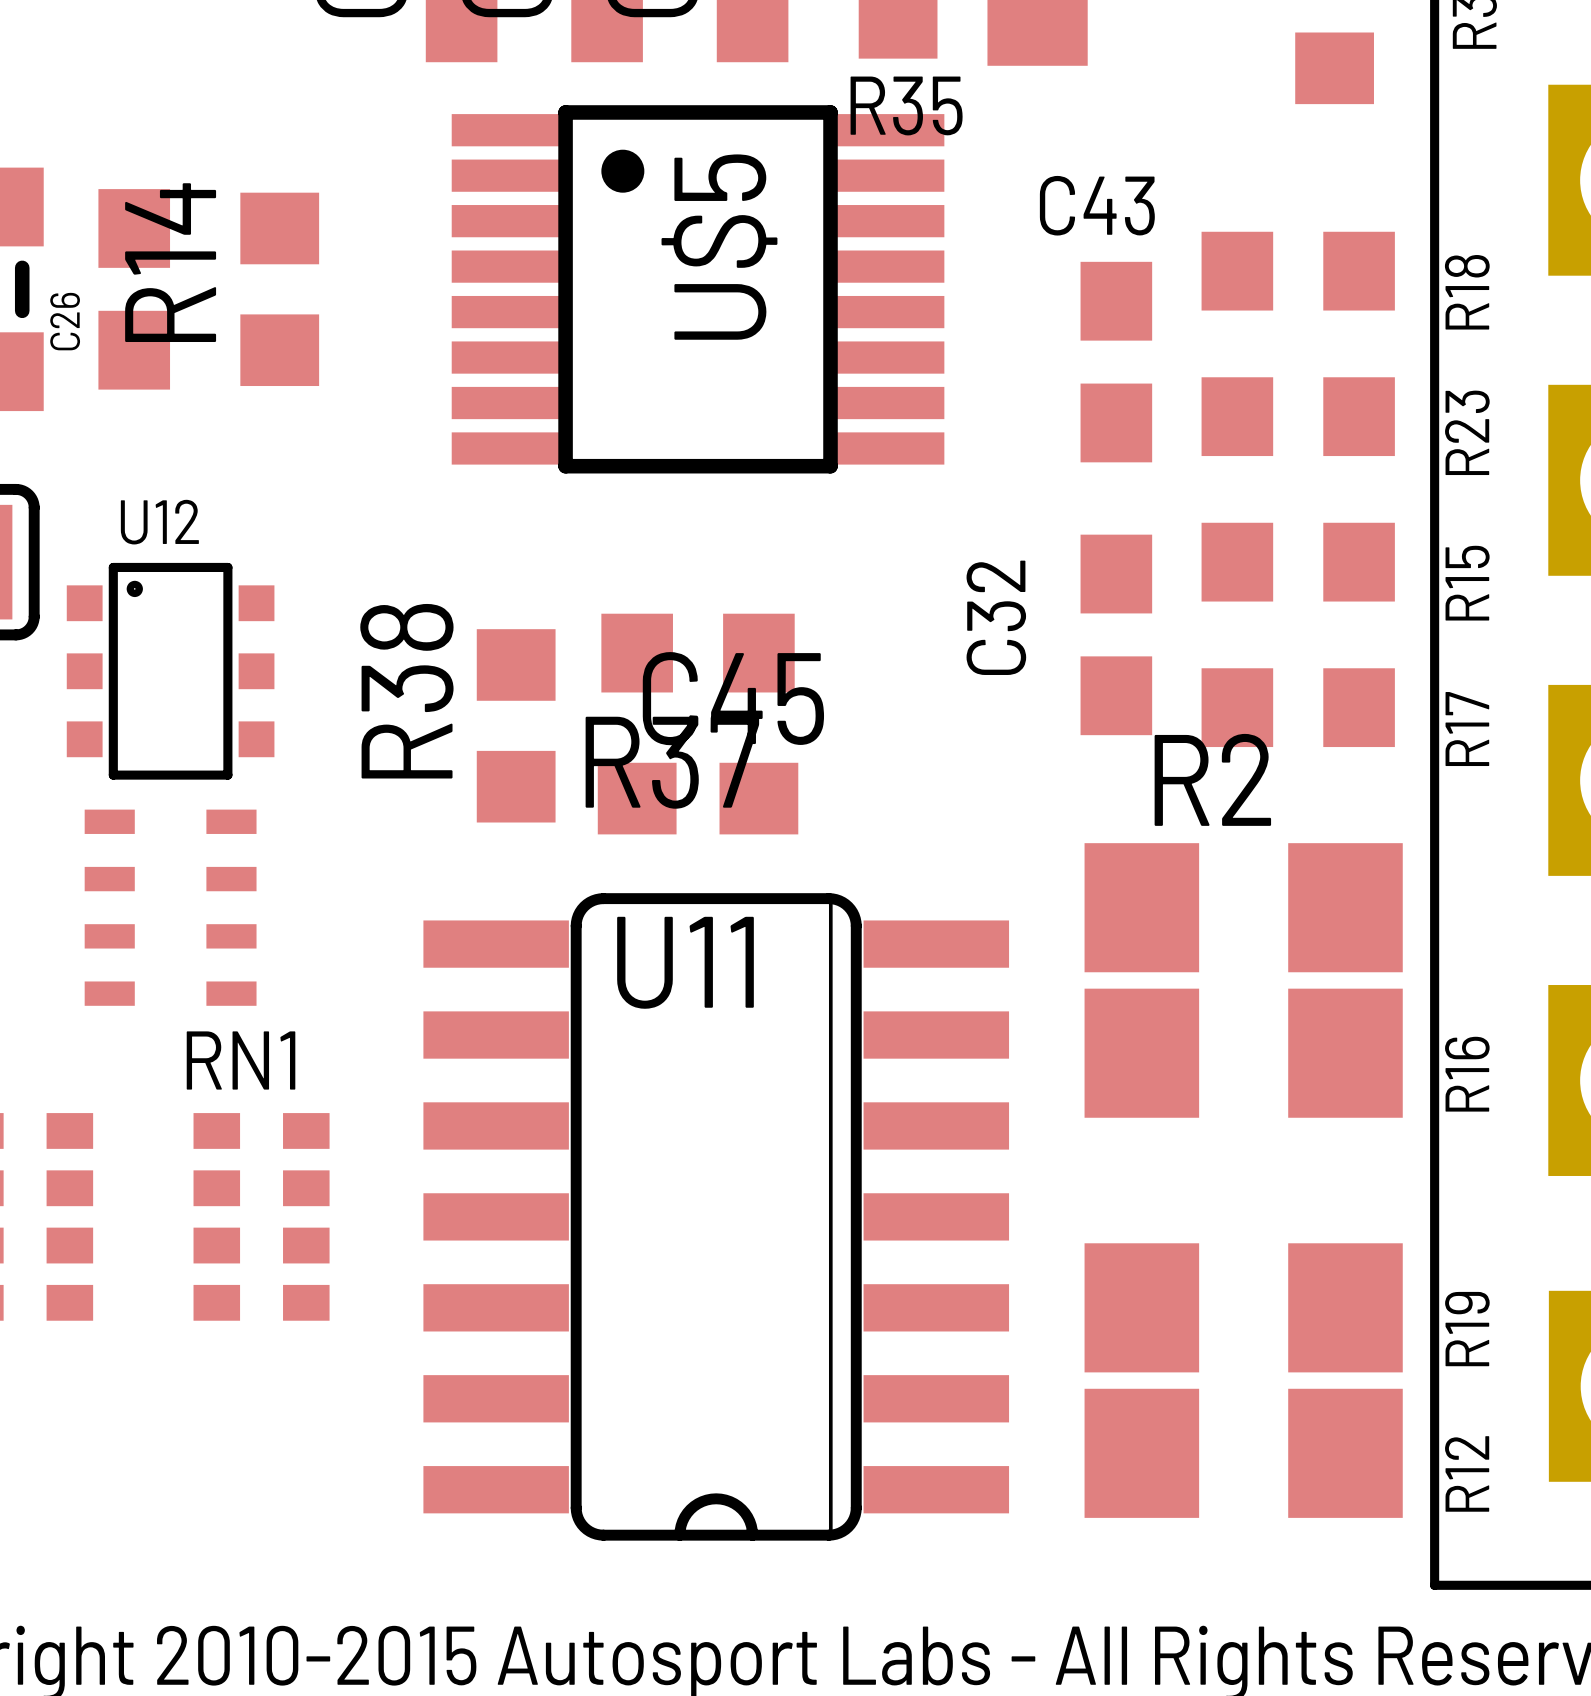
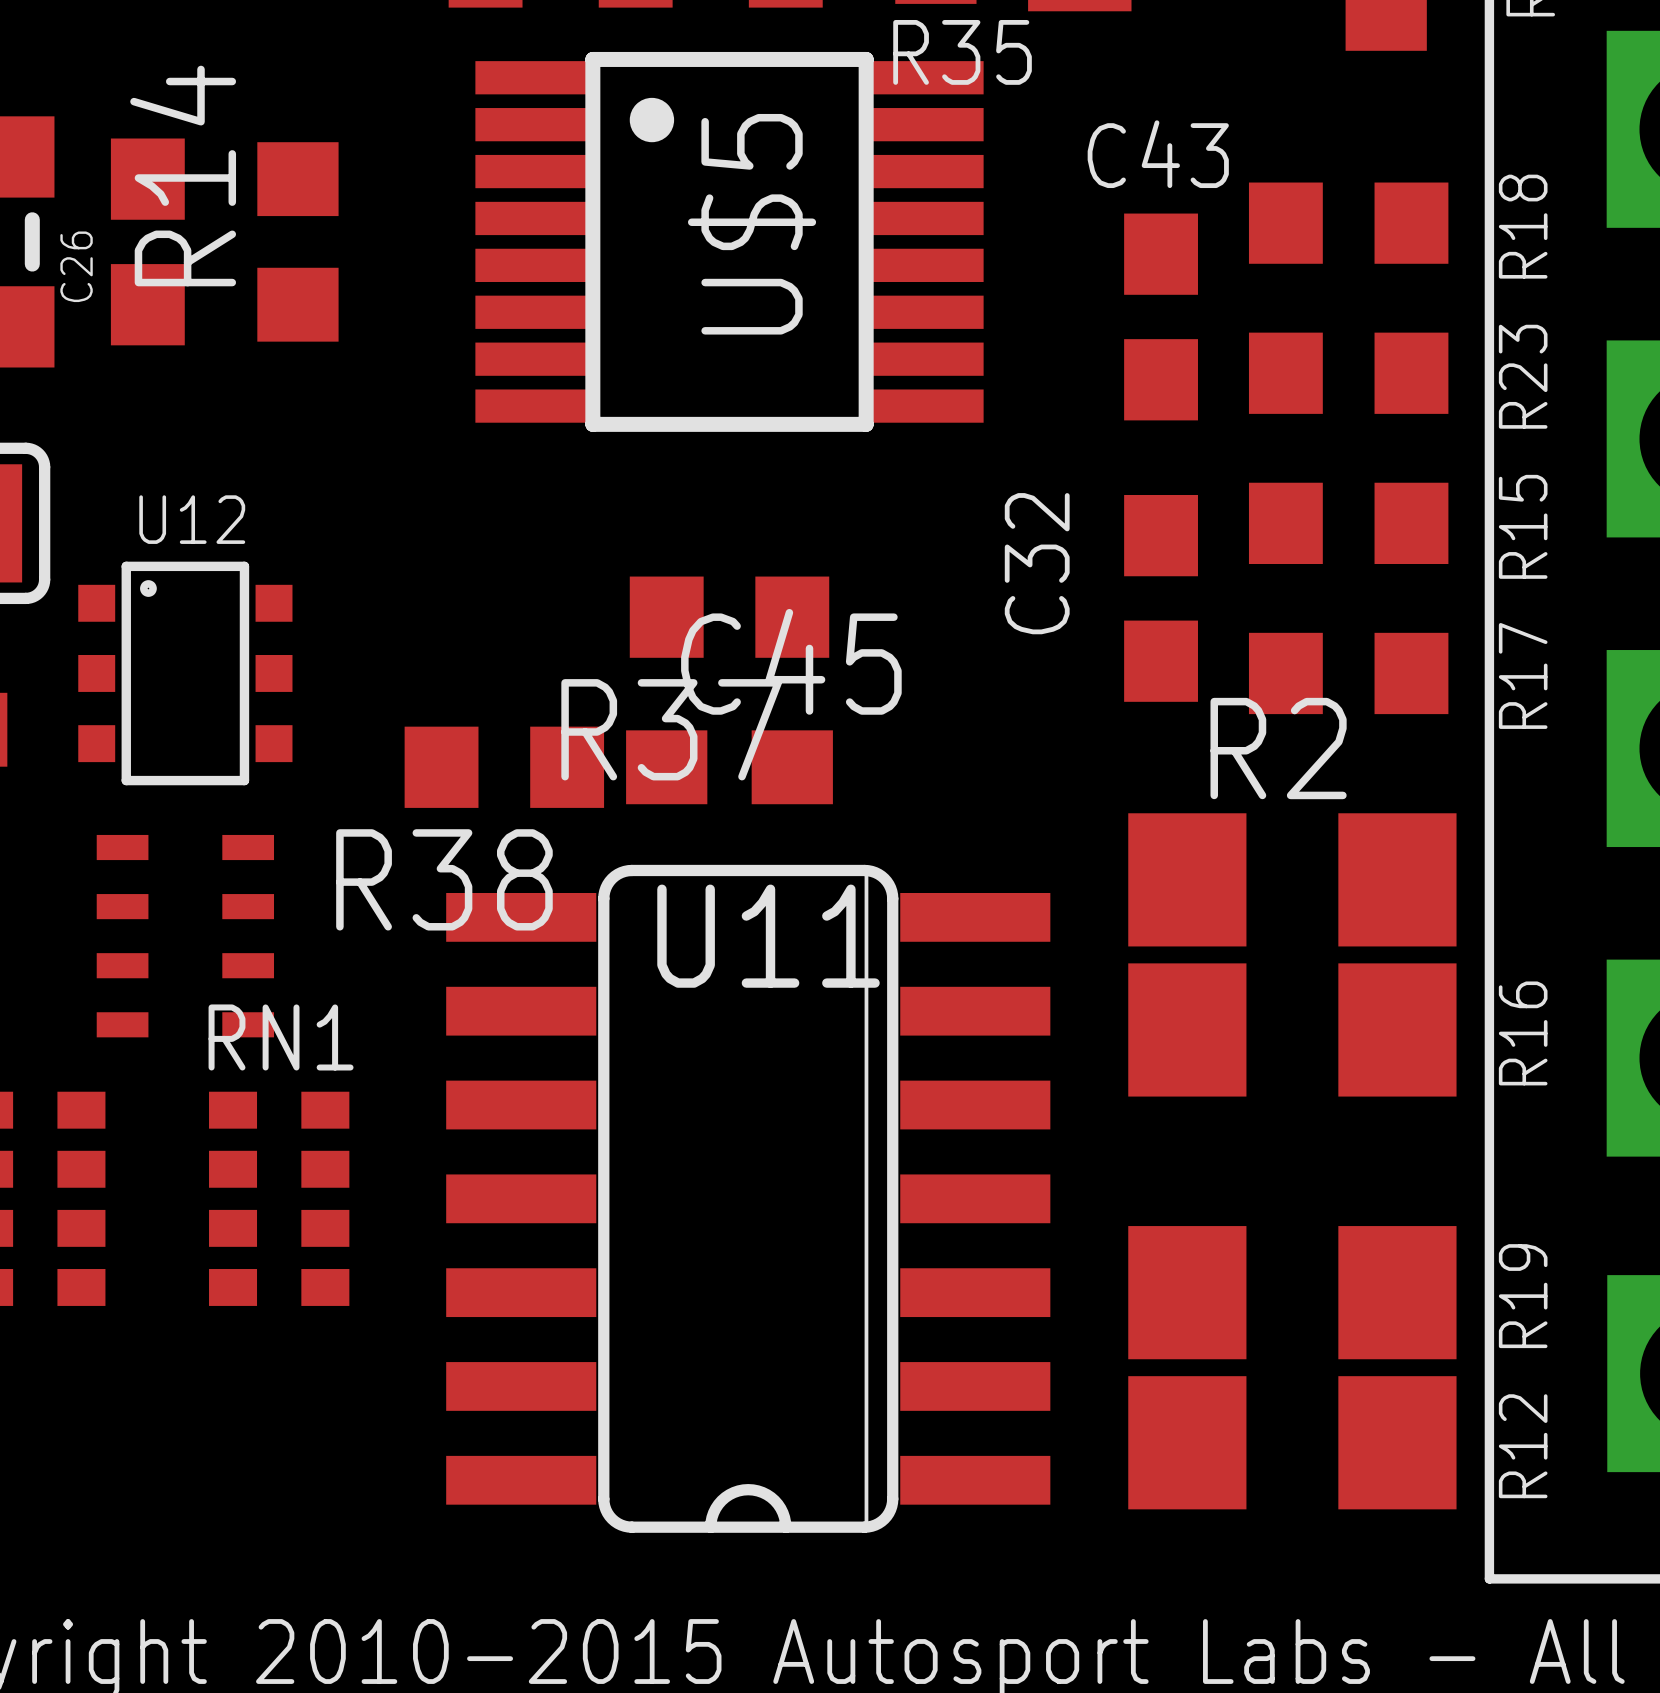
U12 position: (170, 671) -> (185, 673)
R38 name position: R38 (406, 691) -> R38 (444, 879)
R38 rotation: 0° (516, 725) -> 90° clockwise (504, 767)
part position: (170, 907) -> (185, 936)

